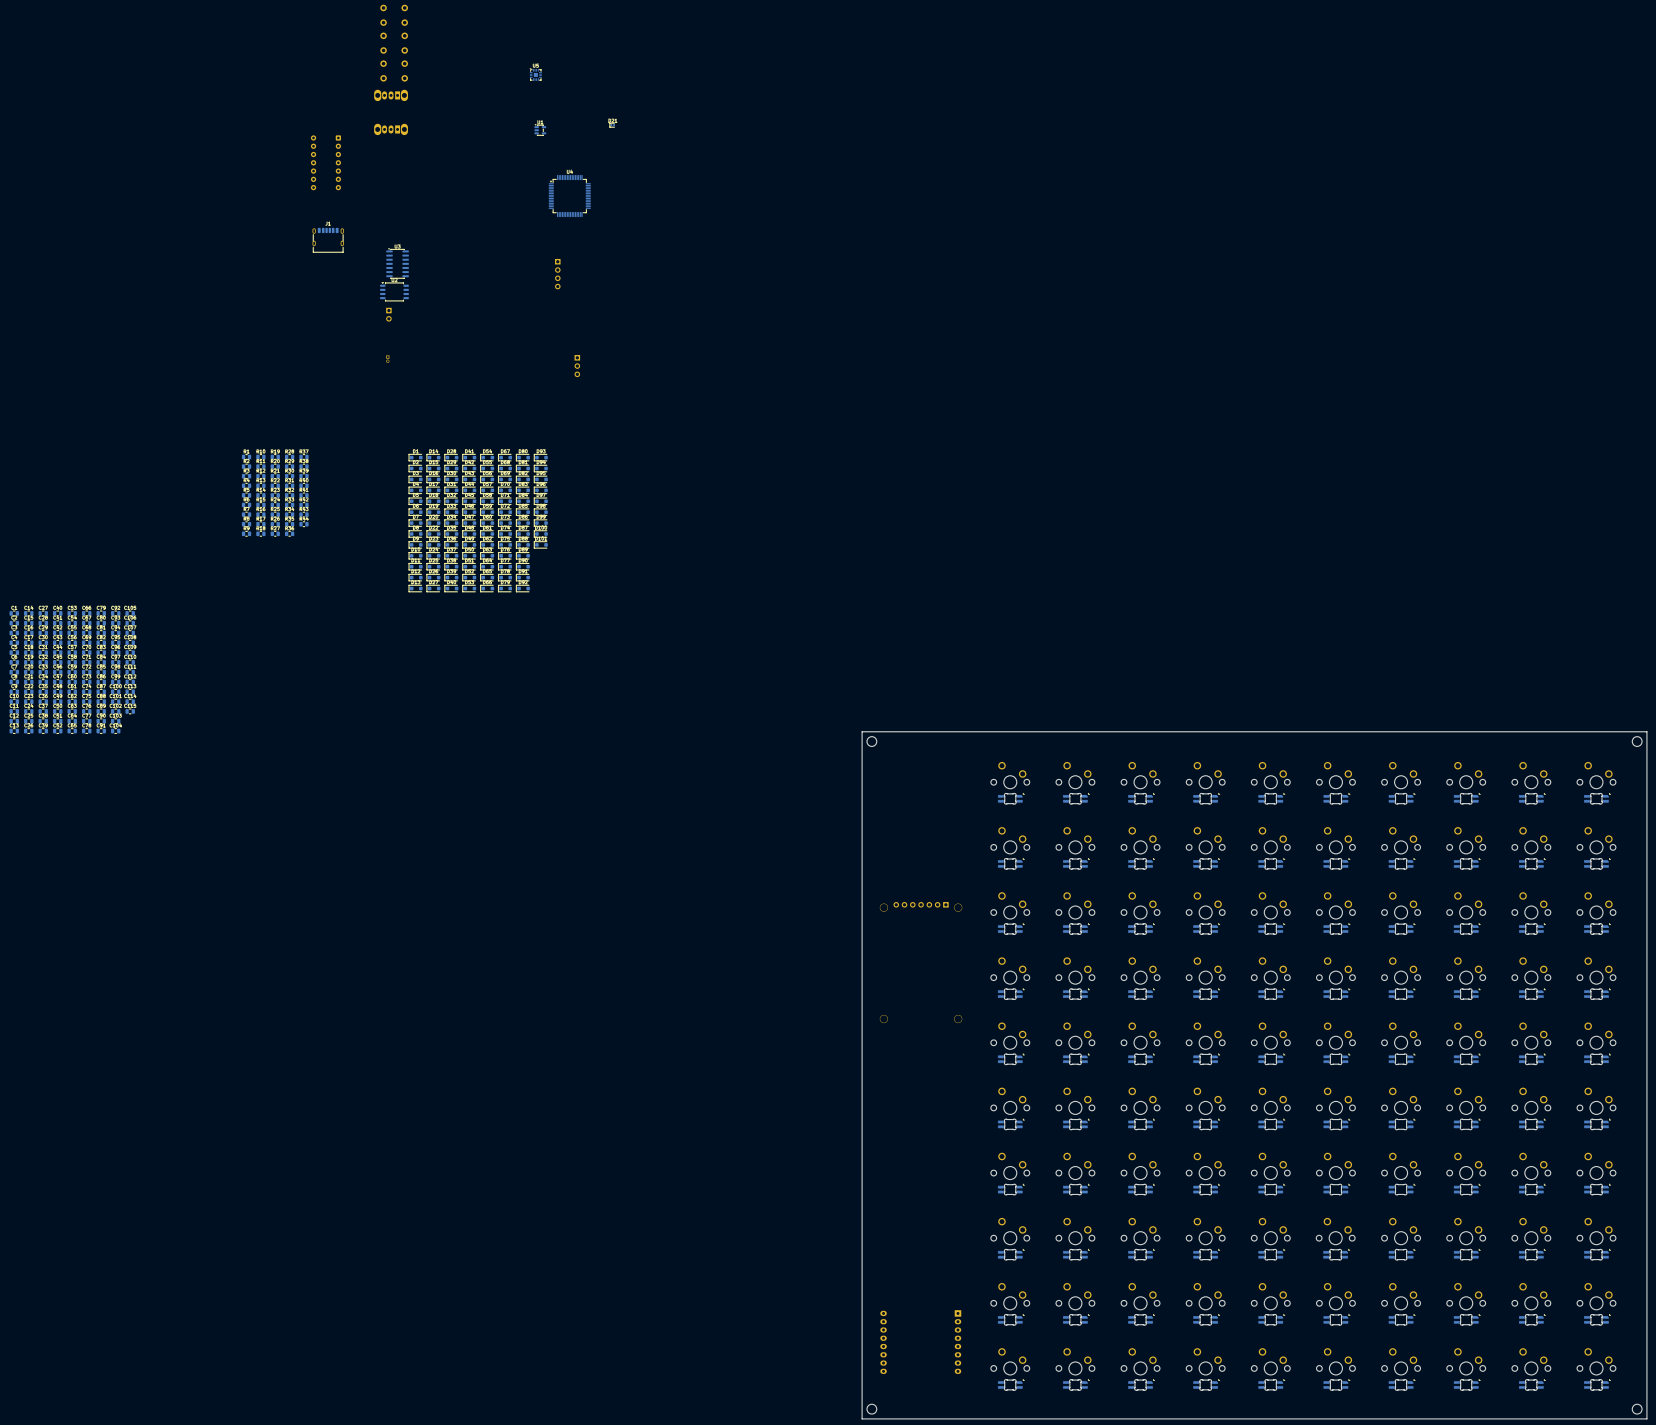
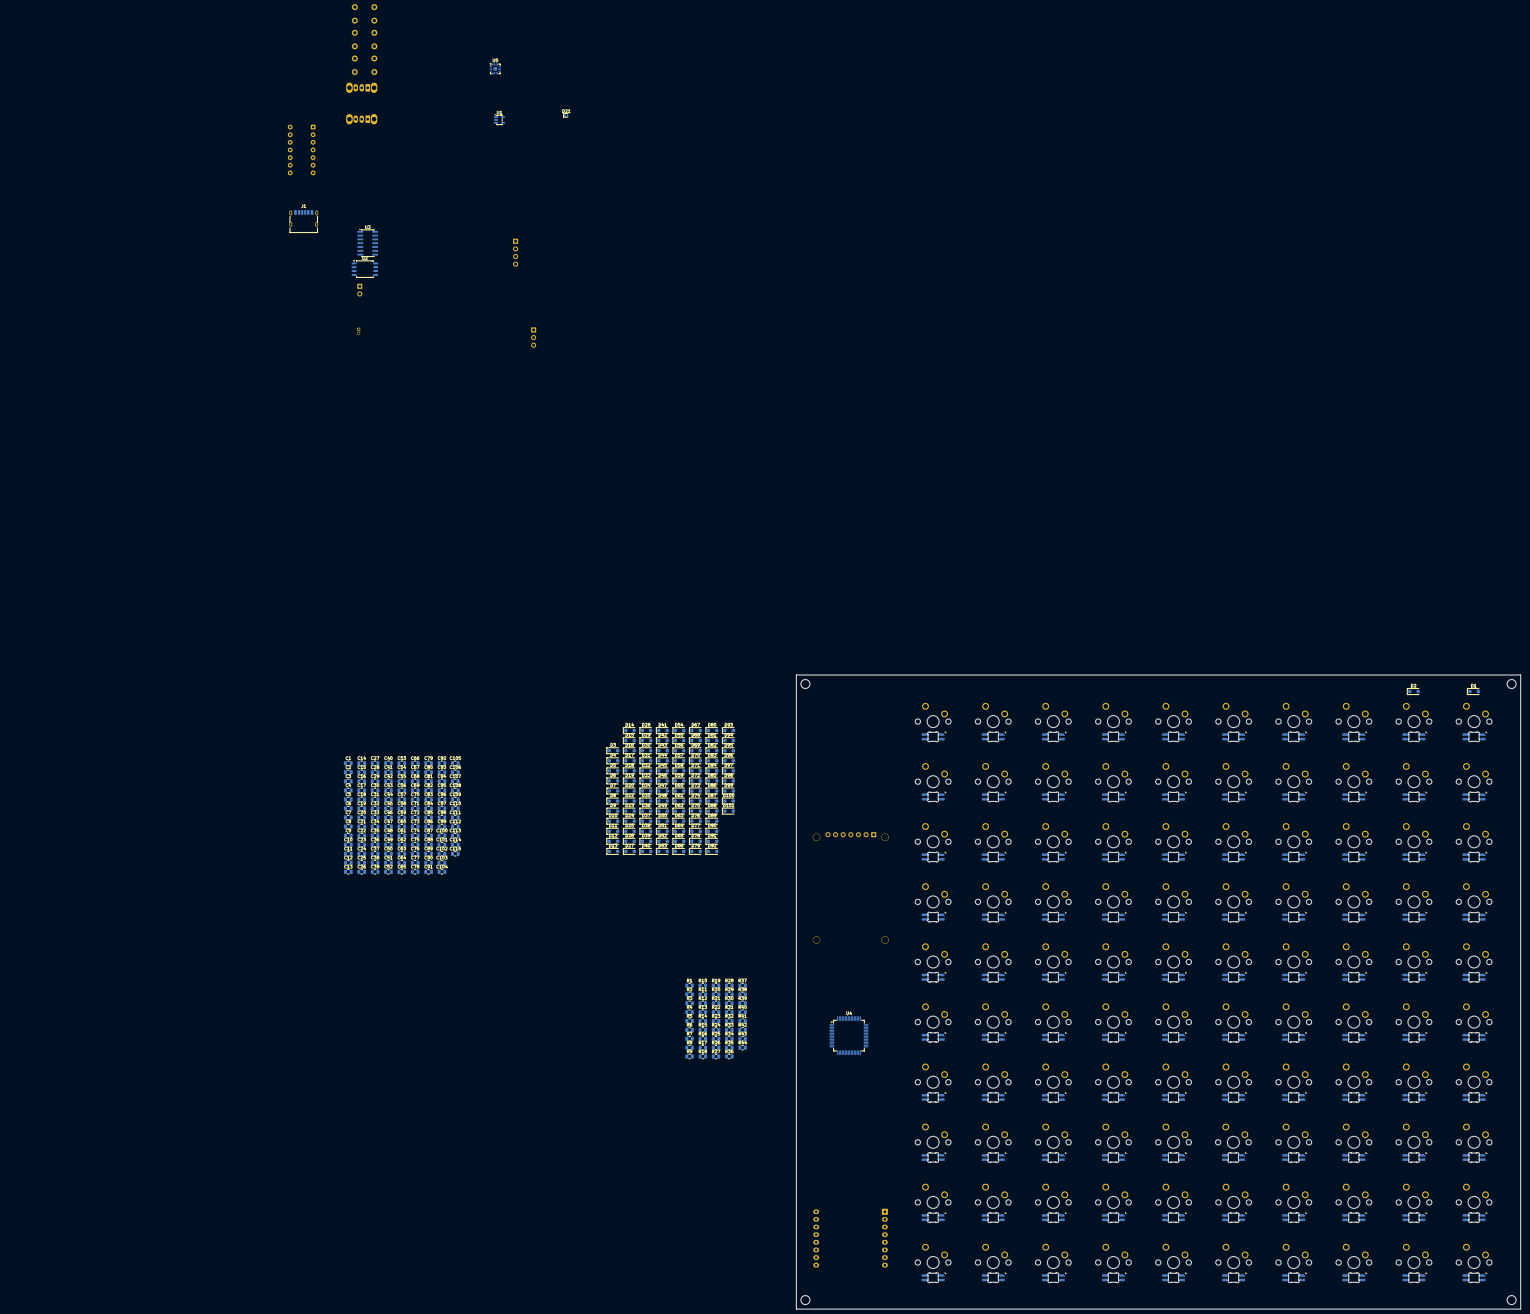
part position: (569, 196) -> (848, 1035)
part position: (246, 456) -> (689, 985)
part position: (260, 456) -> (702, 985)
part position: (275, 456) -> (716, 985)
part position: (289, 456) -> (729, 985)
part position: (303, 456) -> (742, 985)
part position: (415, 457) -> (1473, 691)
part position: (433, 457) -> (629, 730)
part position: (451, 457) -> (646, 730)
part position: (469, 457) -> (662, 730)
part position: (487, 457) -> (679, 730)
part position: (505, 457) -> (695, 730)
part position: (523, 457) -> (712, 730)
part position: (540, 457) -> (728, 730)
part position: (246, 466) -> (689, 994)
part position: (260, 466) -> (702, 994)
part position: (275, 466) -> (716, 994)
part position: (289, 466) -> (729, 994)
part position: (303, 466) -> (742, 994)
part position: (415, 468) -> (1413, 691)
part position: (433, 468) -> (629, 740)
part position: (451, 468) -> (646, 740)
part position: (469, 468) -> (662, 740)
part position: (487, 468) -> (679, 740)
part position: (505, 468) -> (695, 740)
part position: (523, 468) -> (712, 740)
part position: (540, 468) -> (728, 740)
part position: (246, 476) -> (689, 1003)
part position: (260, 476) -> (702, 1003)
part position: (275, 476) -> (716, 1003)
part position: (289, 476) -> (729, 1003)
part position: (303, 476) -> (742, 1003)
part position: (415, 479) -> (613, 750)
part position: (433, 479) -> (629, 750)
part position: (451, 479) -> (646, 750)
part position: (469, 479) -> (662, 750)
part position: (487, 479) -> (679, 750)
part position: (505, 479) -> (695, 750)
part position: (523, 479) -> (712, 750)
part position: (540, 479) -> (728, 750)
part position: (246, 485) -> (689, 1012)
part position: (260, 485) -> (702, 1012)
part position: (275, 485) -> (716, 1012)
part position: (289, 485) -> (729, 1012)
part position: (303, 485) -> (742, 1012)
part position: (415, 490) -> (613, 760)
part position: (433, 490) -> (629, 760)
part position: (451, 490) -> (646, 760)
part position: (469, 490) -> (662, 760)
part position: (487, 490) -> (679, 760)
part position: (505, 490) -> (695, 760)
part position: (523, 490) -> (712, 760)
part position: (540, 490) -> (728, 760)
part position: (246, 495) -> (689, 1021)
part position: (260, 495) -> (702, 1021)
part position: (275, 495) -> (716, 1021)
part position: (289, 495) -> (729, 1021)
part position: (303, 495) -> (742, 1021)
part position: (415, 501) -> (613, 770)
part position: (433, 501) -> (629, 770)
part position: (451, 501) -> (646, 770)
part position: (469, 501) -> (662, 770)
part position: (487, 501) -> (679, 770)
part position: (505, 501) -> (695, 770)
part position: (523, 501) -> (712, 770)
part position: (540, 501) -> (728, 770)
part position: (246, 505) -> (689, 1029)
part position: (260, 505) -> (702, 1029)
part position: (275, 505) -> (716, 1029)
part position: (289, 505) -> (729, 1029)
part position: (303, 505) -> (742, 1029)
part position: (415, 512) -> (613, 780)
part position: (433, 512) -> (629, 780)
part position: (451, 512) -> (646, 780)
part position: (469, 512) -> (662, 780)
part position: (487, 512) -> (679, 780)
part position: (505, 512) -> (695, 780)
part position: (523, 512) -> (712, 780)
part position: (540, 512) -> (728, 780)
part position: (246, 514) -> (689, 1038)
part position: (260, 514) -> (702, 1038)
part position: (275, 514) -> (716, 1038)
part position: (289, 514) -> (729, 1038)
part position: (303, 514) -> (742, 1038)
part position: (415, 523) -> (613, 791)
part position: (433, 523) -> (629, 791)
part position: (451, 523) -> (646, 791)
part position: (469, 523) -> (662, 791)
part position: (487, 523) -> (679, 791)
part position: (505, 523) -> (695, 791)
part position: (523, 523) -> (712, 791)
part position: (540, 523) -> (728, 791)
part position: (246, 524) -> (689, 1047)
part position: (260, 524) -> (702, 1047)
part position: (275, 524) -> (716, 1047)
part position: (289, 524) -> (729, 1047)
part position: (303, 524) -> (742, 1047)
part position: (246, 533) -> (689, 1056)
part position: (260, 533) -> (702, 1056)
part position: (275, 533) -> (716, 1056)
part position: (289, 533) -> (729, 1056)
part position: (415, 533) -> (613, 801)
part position: (433, 533) -> (629, 801)
part position: (451, 533) -> (646, 801)
part position: (469, 533) -> (662, 801)
part position: (487, 533) -> (679, 801)
part position: (505, 533) -> (695, 801)
part position: (523, 533) -> (712, 801)
part position: (540, 533) -> (728, 801)
part position: (415, 544) -> (613, 811)
part position: (433, 544) -> (629, 811)
part position: (451, 544) -> (646, 811)
part position: (469, 544) -> (662, 811)
part position: (487, 544) -> (679, 811)
part position: (505, 544) -> (695, 811)
part position: (523, 544) -> (712, 811)
part position: (540, 544) -> (728, 811)
part position: (415, 555) -> (613, 821)
part position: (433, 555) -> (629, 821)
part position: (451, 555) -> (646, 821)
part position: (469, 555) -> (662, 821)
part position: (487, 555) -> (679, 821)
part position: (505, 555) -> (695, 821)
part position: (523, 555) -> (712, 821)
part position: (415, 566) -> (613, 831)
part position: (433, 566) -> (629, 831)
part position: (451, 566) -> (646, 831)
part position: (469, 566) -> (662, 831)
part position: (487, 566) -> (679, 831)
part position: (505, 566) -> (695, 831)
part position: (523, 566) -> (712, 831)
part position: (415, 577) -> (613, 841)
part position: (433, 577) -> (629, 841)
part position: (451, 577) -> (646, 841)
part position: (469, 577) -> (662, 841)
part position: (487, 577) -> (679, 841)
part position: (505, 577) -> (695, 841)
part position: (523, 577) -> (712, 841)
part position: (415, 588) -> (613, 851)
part position: (433, 588) -> (629, 851)
part position: (451, 588) -> (646, 851)
part position: (469, 588) -> (662, 851)
part position: (487, 588) -> (679, 851)
part position: (505, 588) -> (695, 851)
part position: (523, 588) -> (712, 851)
part position: (14, 613) -> (348, 763)
part position: (28, 613) -> (361, 763)
part position: (43, 613) -> (375, 763)
part position: (57, 613) -> (388, 763)
part position: (72, 613) -> (401, 763)
part position: (86, 613) -> (415, 763)
part position: (101, 613) -> (428, 763)
part position: (115, 613) -> (441, 763)
part position: (130, 613) -> (455, 763)
part position: (14, 623) -> (348, 772)
part position: (28, 623) -> (361, 772)
part position: (43, 623) -> (375, 772)
part position: (57, 623) -> (388, 772)
part position: (72, 623) -> (401, 772)
part position: (86, 623) -> (415, 772)
part position: (101, 623) -> (428, 772)
part position: (115, 623) -> (441, 772)
part position: (130, 623) -> (455, 772)
part position: (14, 633) -> (348, 781)
part position: (28, 633) -> (361, 781)
part position: (43, 633) -> (375, 781)
part position: (57, 633) -> (388, 781)
part position: (72, 633) -> (401, 781)
part position: (86, 633) -> (415, 781)
part position: (101, 633) -> (428, 781)
part position: (115, 633) -> (441, 781)
part position: (130, 633) -> (455, 781)
part position: (14, 642) -> (348, 790)
part position: (28, 642) -> (361, 790)
part position: (43, 642) -> (375, 790)
part position: (57, 642) -> (388, 790)
part position: (72, 642) -> (401, 790)
part position: (86, 642) -> (415, 790)
part position: (101, 642) -> (428, 790)
part position: (115, 642) -> (441, 790)
part position: (130, 642) -> (455, 790)
part position: (14, 652) -> (348, 799)
part position: (28, 652) -> (361, 799)
part position: (43, 652) -> (375, 799)
part position: (57, 652) -> (388, 799)
part position: (72, 652) -> (401, 799)
part position: (86, 652) -> (415, 799)
part position: (101, 652) -> (428, 799)
part position: (115, 652) -> (441, 799)
part position: (130, 652) -> (455, 799)
part position: (14, 662) -> (348, 808)
part position: (28, 662) -> (361, 808)
part position: (43, 662) -> (375, 808)
part position: (57, 662) -> (388, 808)
part position: (72, 662) -> (401, 808)
part position: (86, 662) -> (415, 808)
part position: (101, 662) -> (428, 808)
part position: (115, 662) -> (441, 808)
part position: (130, 662) -> (455, 808)
part position: (14, 672) -> (348, 817)
part position: (28, 672) -> (361, 817)
part position: (43, 672) -> (375, 817)
part position: (57, 672) -> (388, 817)
part position: (72, 672) -> (401, 817)
part position: (86, 672) -> (415, 817)
part position: (101, 672) -> (428, 817)
part position: (115, 672) -> (441, 817)
part position: (130, 672) -> (455, 817)
part position: (14, 682) -> (348, 826)
part position: (28, 682) -> (361, 826)
part position: (43, 682) -> (375, 826)
part position: (57, 682) -> (388, 826)
part position: (72, 682) -> (401, 826)
part position: (86, 682) -> (415, 826)
part position: (101, 682) -> (428, 826)
part position: (115, 682) -> (441, 826)
part position: (130, 682) -> (455, 826)
part position: (14, 691) -> (348, 835)
part position: (28, 691) -> (361, 835)
part position: (43, 691) -> (375, 835)
part position: (57, 691) -> (388, 835)
part position: (72, 691) -> (401, 835)
part position: (86, 691) -> (415, 835)
part position: (101, 691) -> (428, 835)
part position: (115, 691) -> (441, 835)
part position: (130, 691) -> (455, 835)
part position: (14, 701) -> (348, 844)
part position: (28, 701) -> (361, 844)
part position: (43, 701) -> (375, 844)
part position: (57, 701) -> (388, 844)
part position: (72, 701) -> (401, 844)
part position: (86, 701) -> (415, 844)
part position: (101, 701) -> (428, 844)
part position: (115, 701) -> (441, 844)
part position: (130, 701) -> (455, 844)
part position: (14, 711) -> (348, 853)
part position: (28, 711) -> (361, 853)
part position: (43, 711) -> (375, 853)
part position: (57, 711) -> (388, 853)
part position: (72, 711) -> (401, 853)
part position: (86, 711) -> (415, 853)
part position: (101, 711) -> (428, 853)
part position: (115, 711) -> (441, 853)
part position: (130, 711) -> (455, 853)
part position: (14, 721) -> (348, 862)
part position: (28, 721) -> (361, 862)
part position: (43, 721) -> (375, 862)
part position: (57, 721) -> (388, 862)
part position: (72, 721) -> (401, 862)
part position: (86, 721) -> (415, 862)
part position: (101, 721) -> (428, 862)
part position: (115, 721) -> (441, 862)
part position: (14, 731) -> (348, 871)
part position: (28, 731) -> (361, 871)
part position: (43, 731) -> (375, 871)
part position: (57, 731) -> (388, 871)
part position: (72, 731) -> (401, 871)
part position: (86, 731) -> (415, 871)
part position: (101, 731) -> (428, 871)
part position: (115, 731) -> (441, 871)

